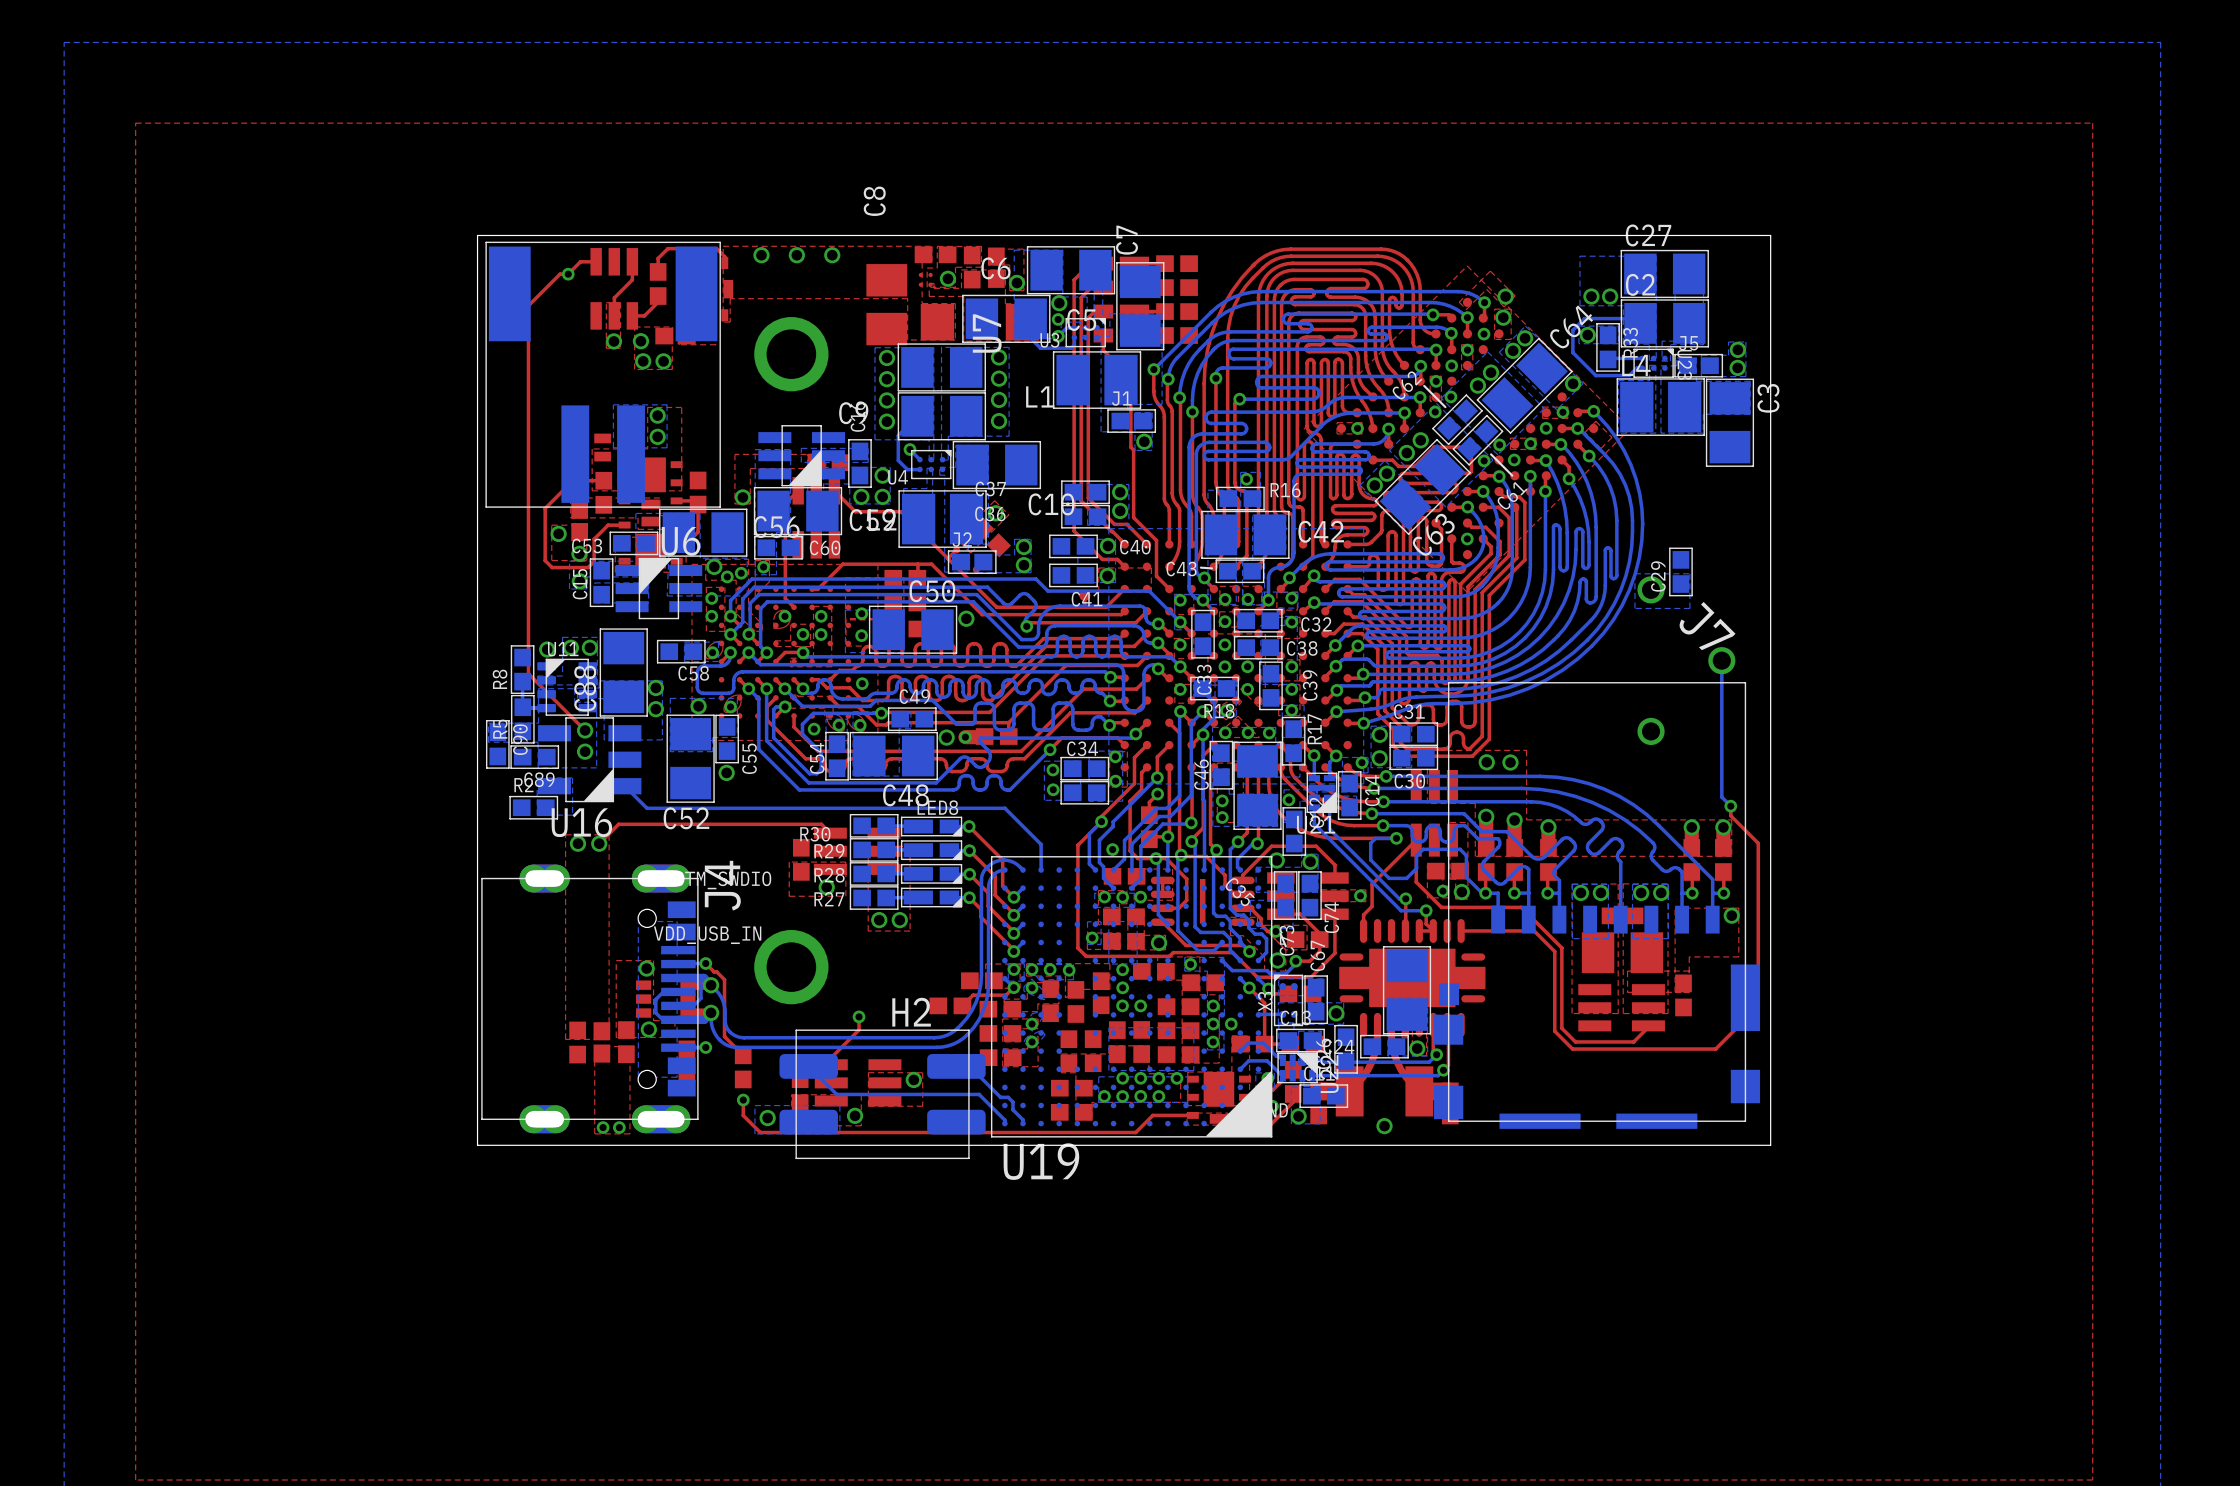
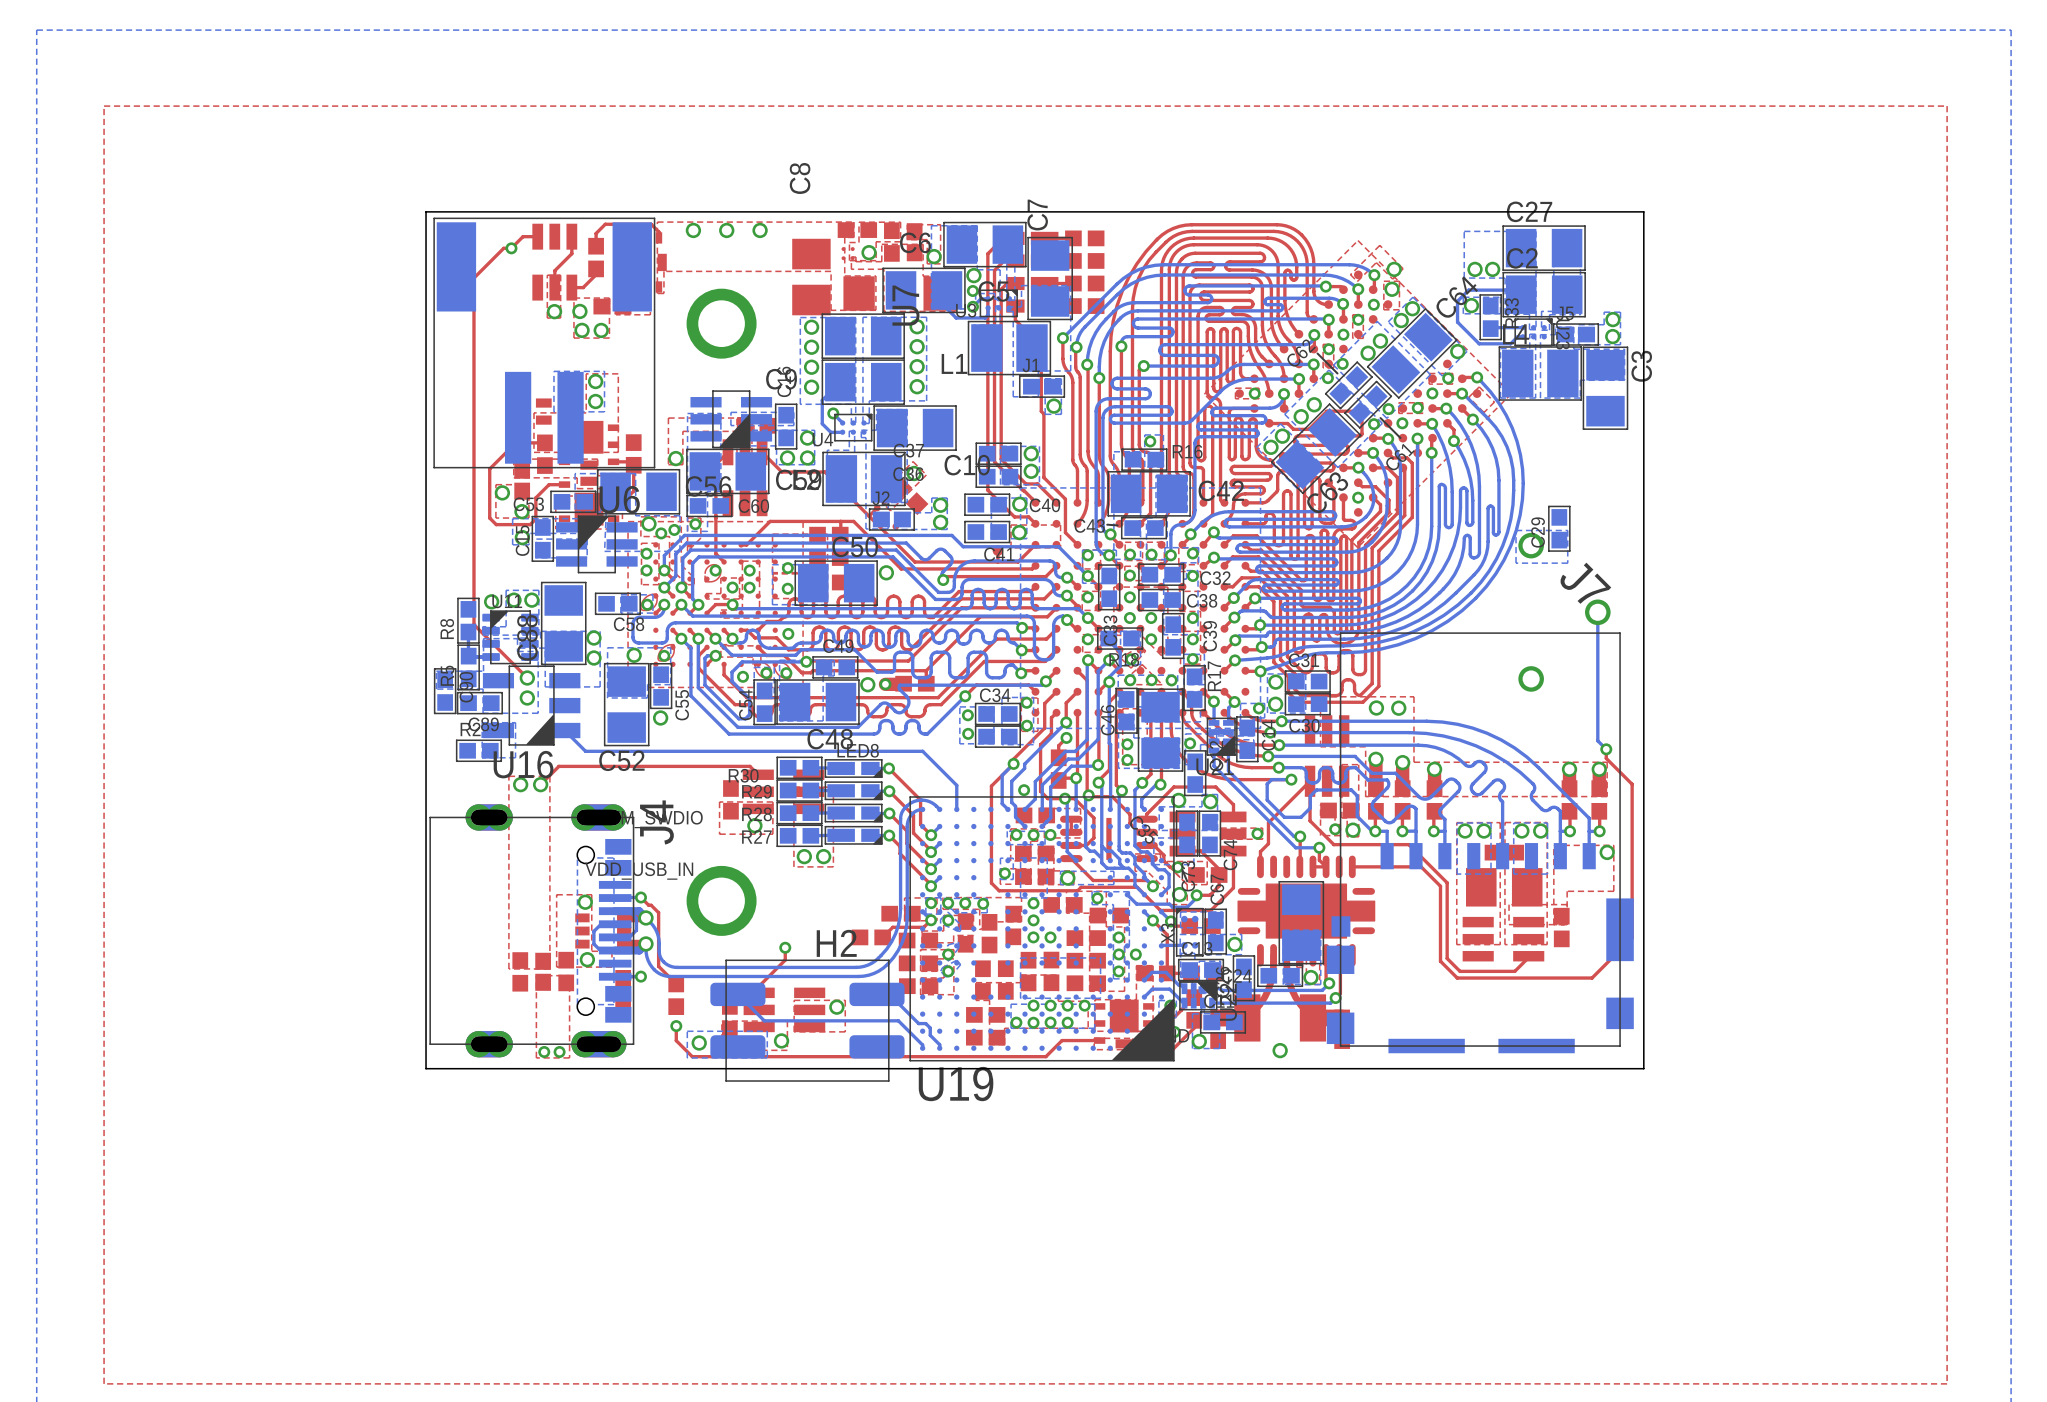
bottom track: none -> (1101, 845) (1106, 851) (1111, 851) (1119, 859) (1119, 863) (1124, 868)
bottom track: (1177, 909) (1177, 930) (1197, 950) (1214, 950) (1222, 942) -> (1085, 846) (1090, 851) (1094, 851) (1100, 857)
bottom zone outline: none -> (1113, 871) (1113, 884) (1060, 884) (1060, 871) (1113, 871)

